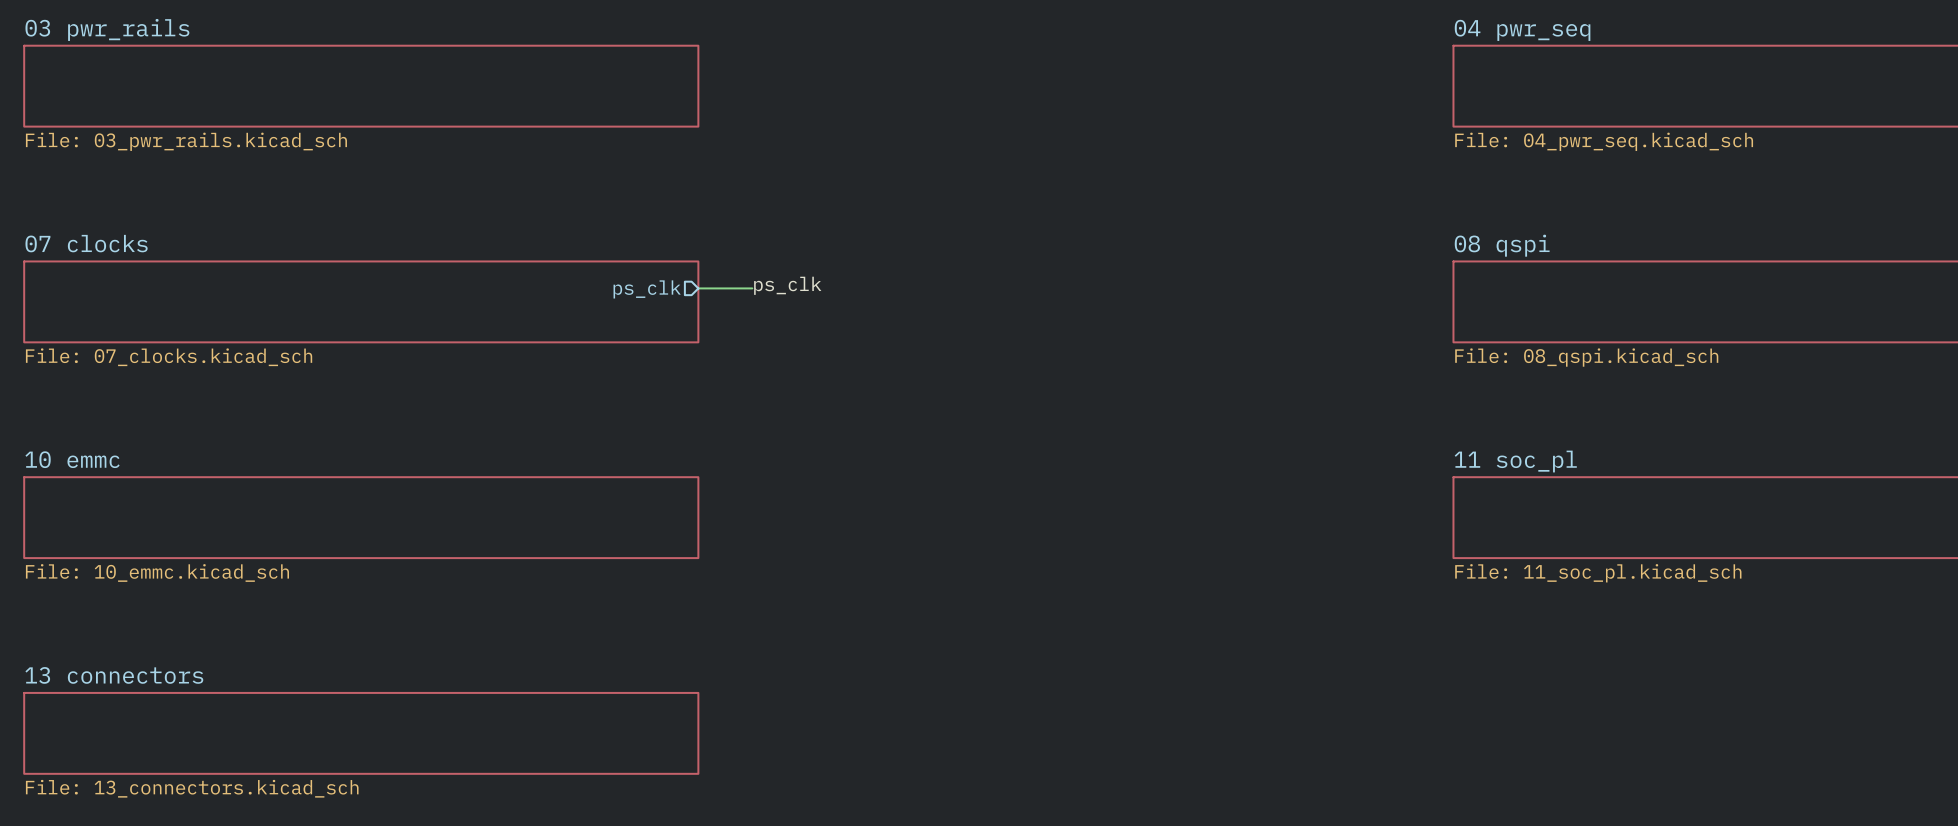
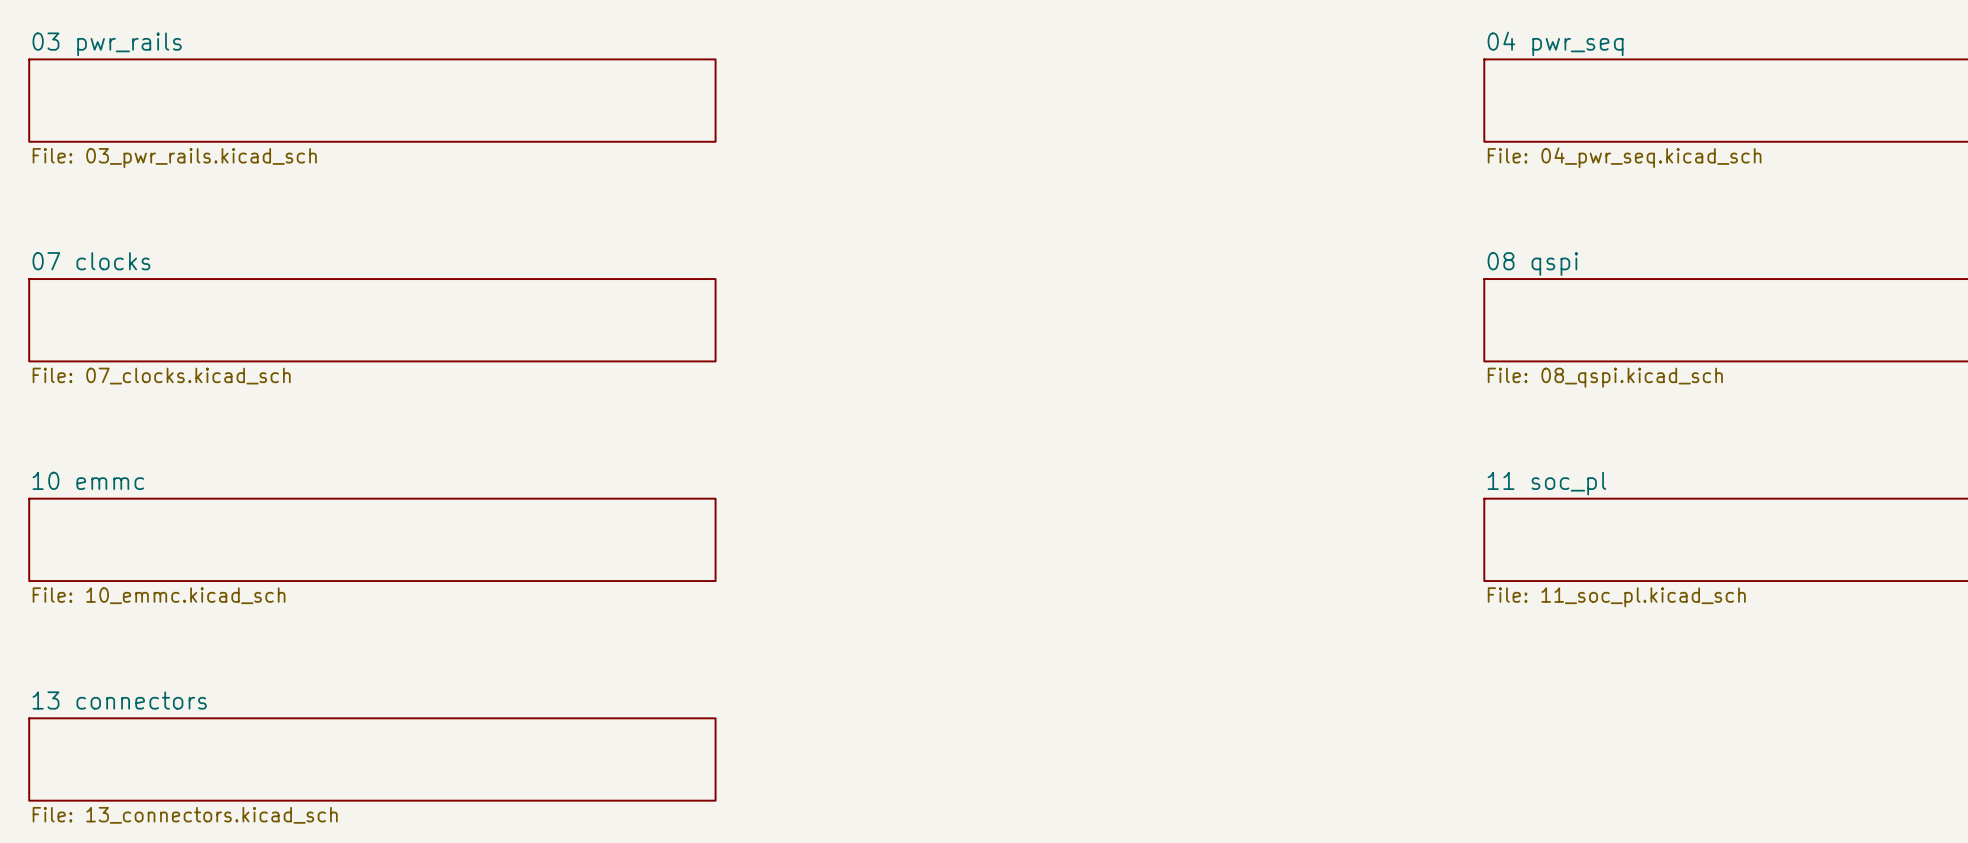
label: ps_clk (787, 285) -> none
wire: (698, 288) (752, 288) -> none
sheet pin: ps_clk (647, 289) -> none

